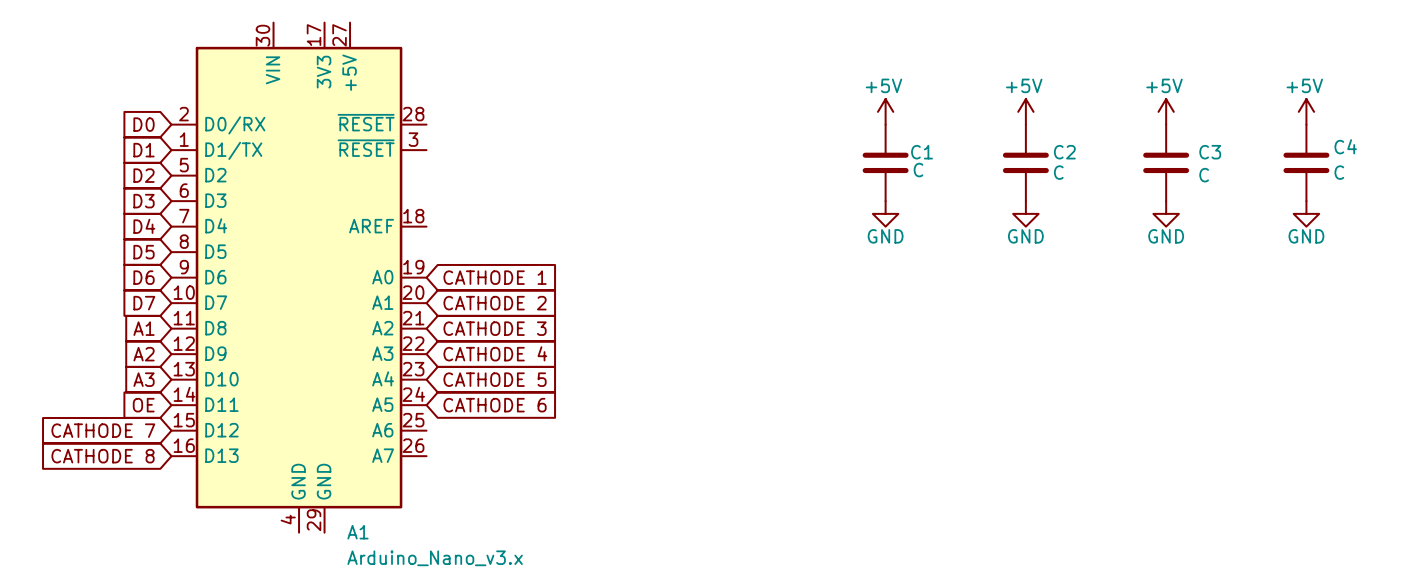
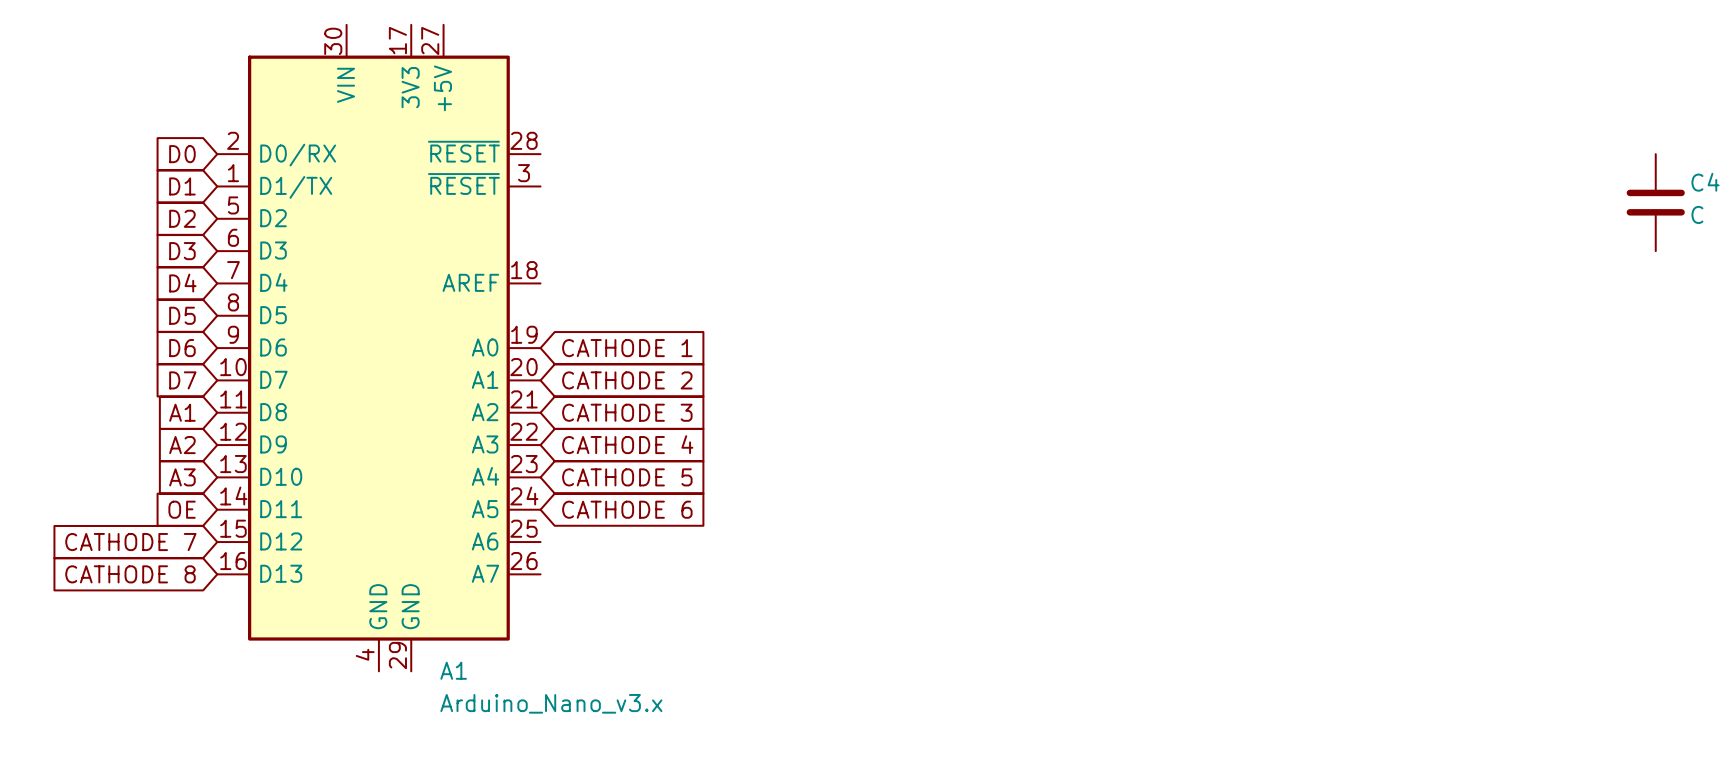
power symbol: +5V (885, 111) -> none
power symbol: +5V (1025, 111) -> none
power symbol: +5V (1166, 111) -> none
power symbol: +5V (1306, 111) -> none
C1: C (885, 162) -> none
C2: C (1025, 162) -> none
C3: C (1166, 162) -> none
power symbol: GND (885, 213) -> none
power symbol: GND (1025, 213) -> none
power symbol: GND (1166, 213) -> none
power symbol: GND (1306, 213) -> none

